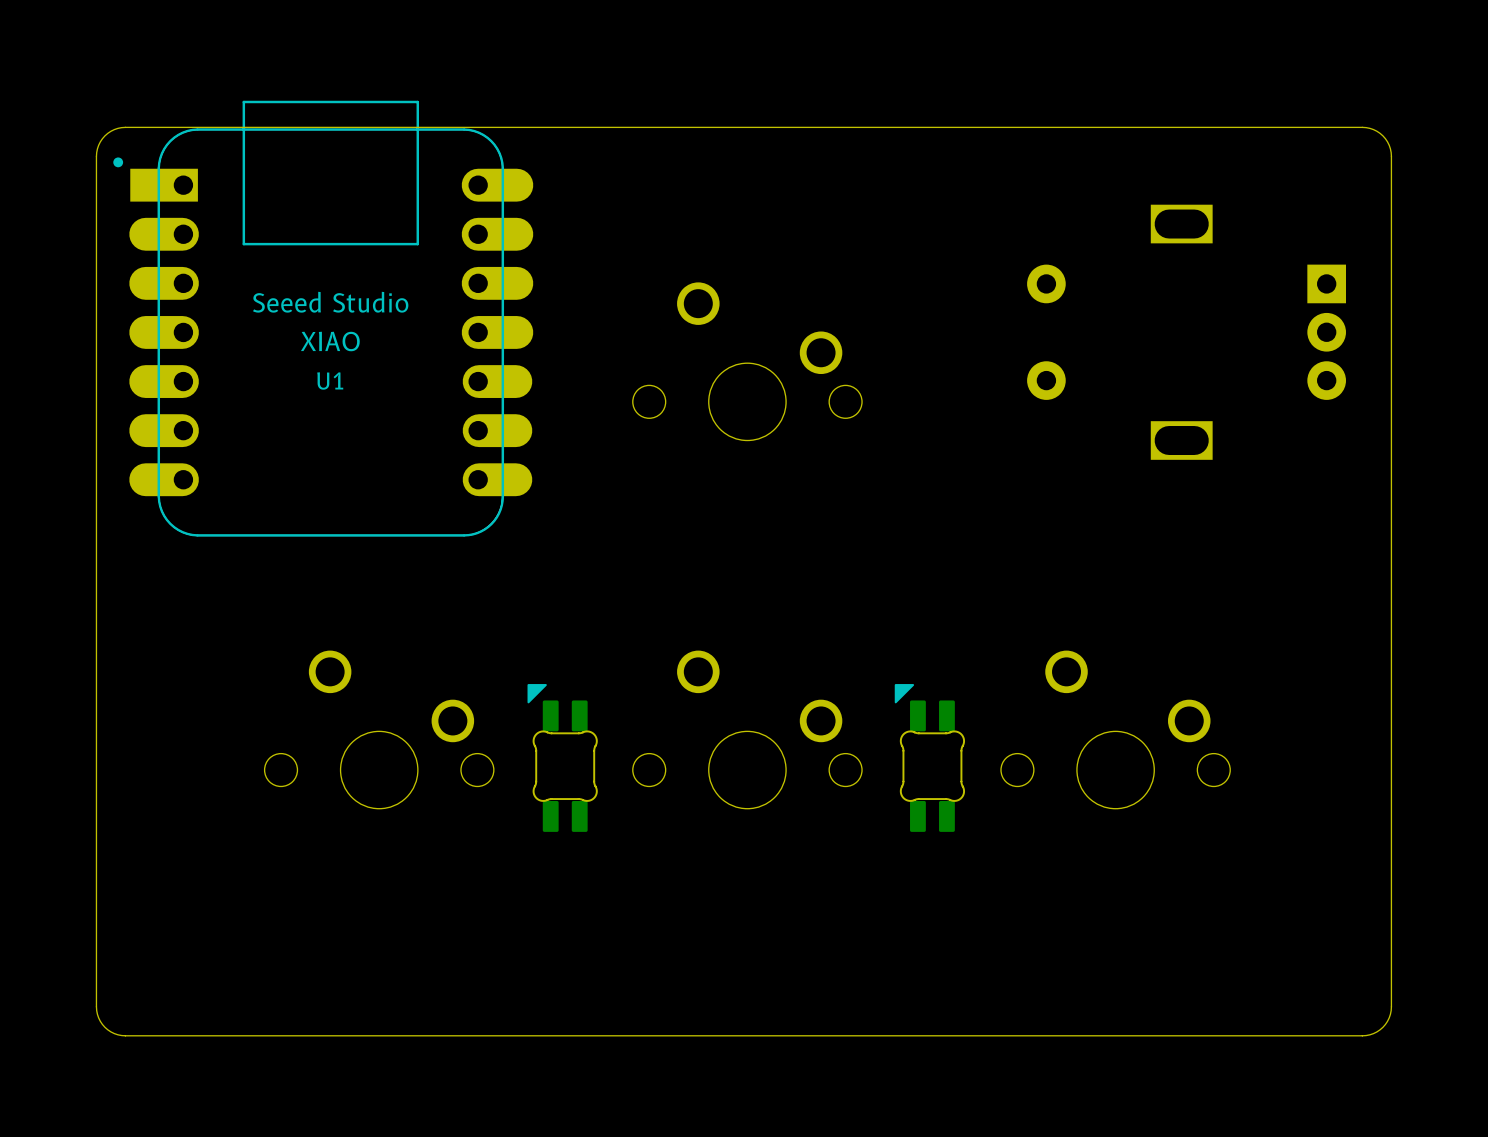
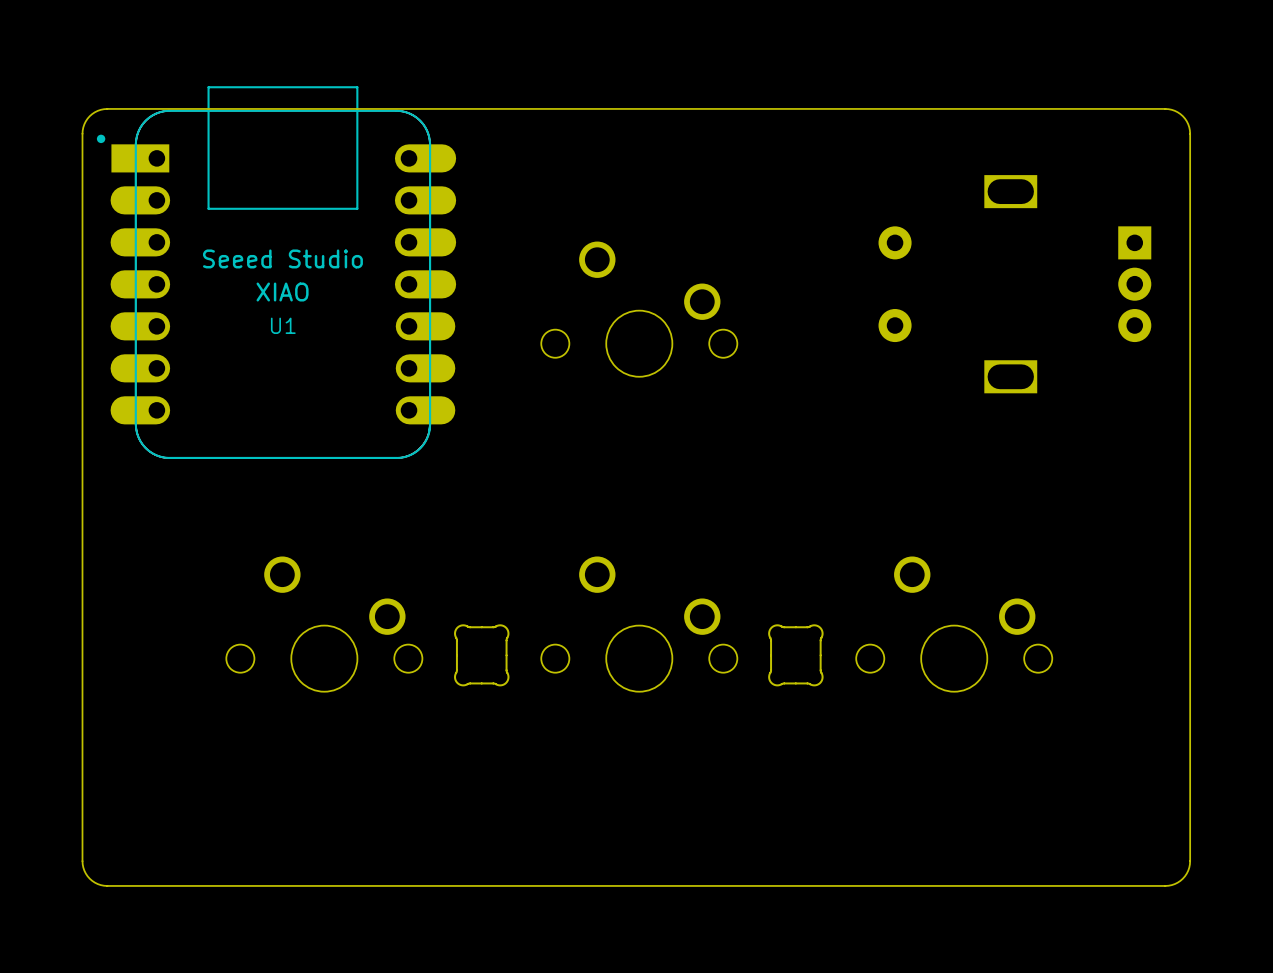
part footprint: [527, 684, 598, 832] -> [454, 624, 510, 687]
part footprint: [894, 684, 966, 832] -> [768, 624, 824, 687]

